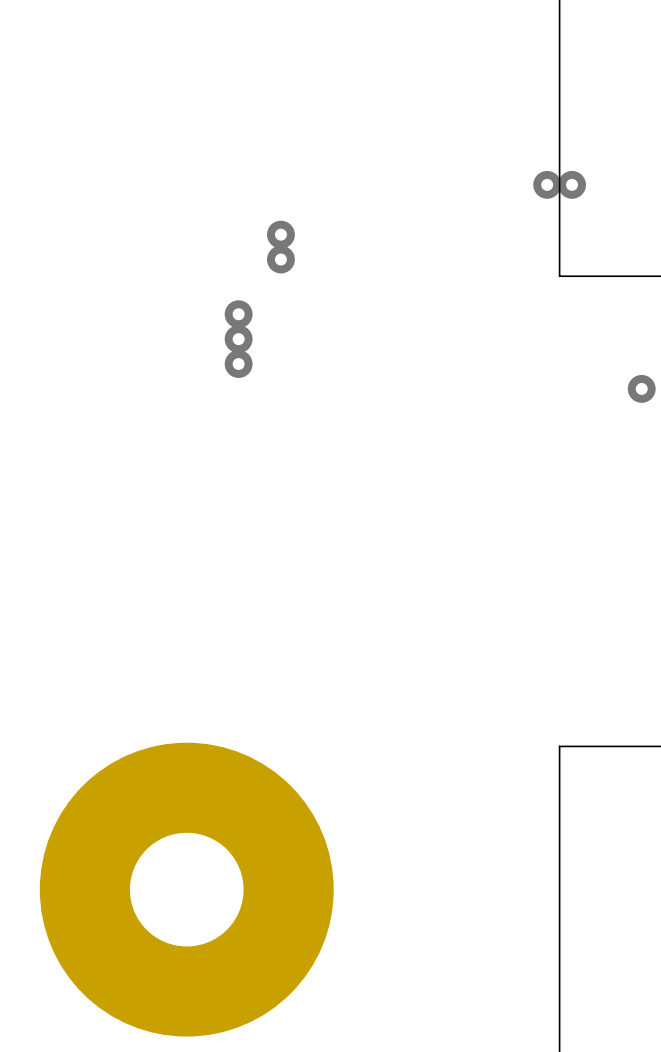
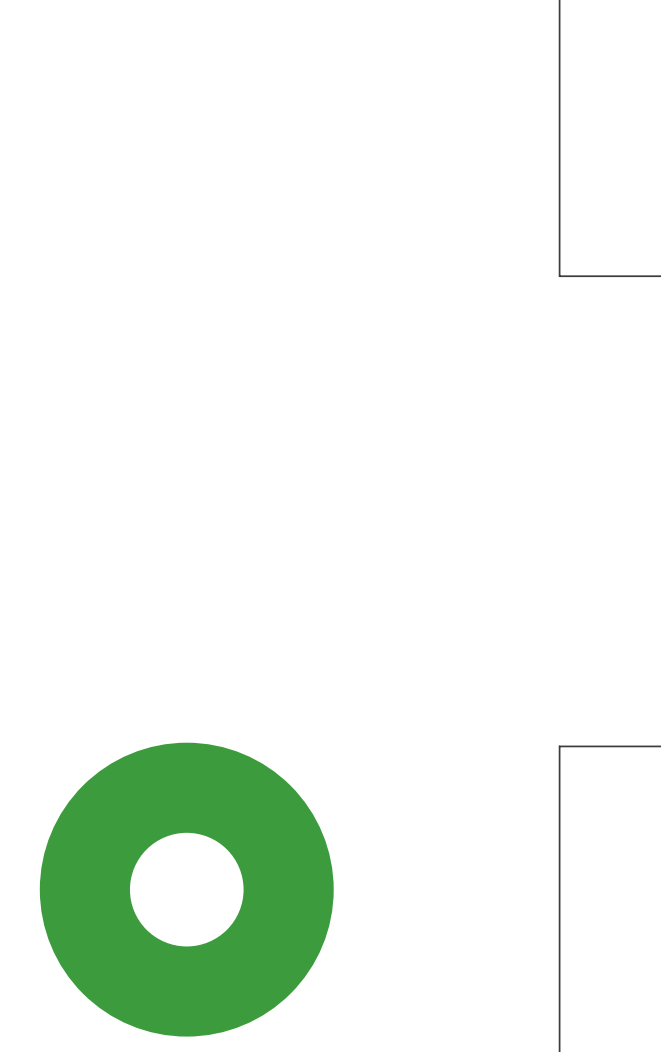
via: (547, 184) -> none
via: (572, 184) -> none
via: (280, 234) -> none
via: (280, 259) -> none
via: (238, 314) -> none
via: (238, 339) -> none
via: (238, 364) -> none
via: (641, 388) -> none

